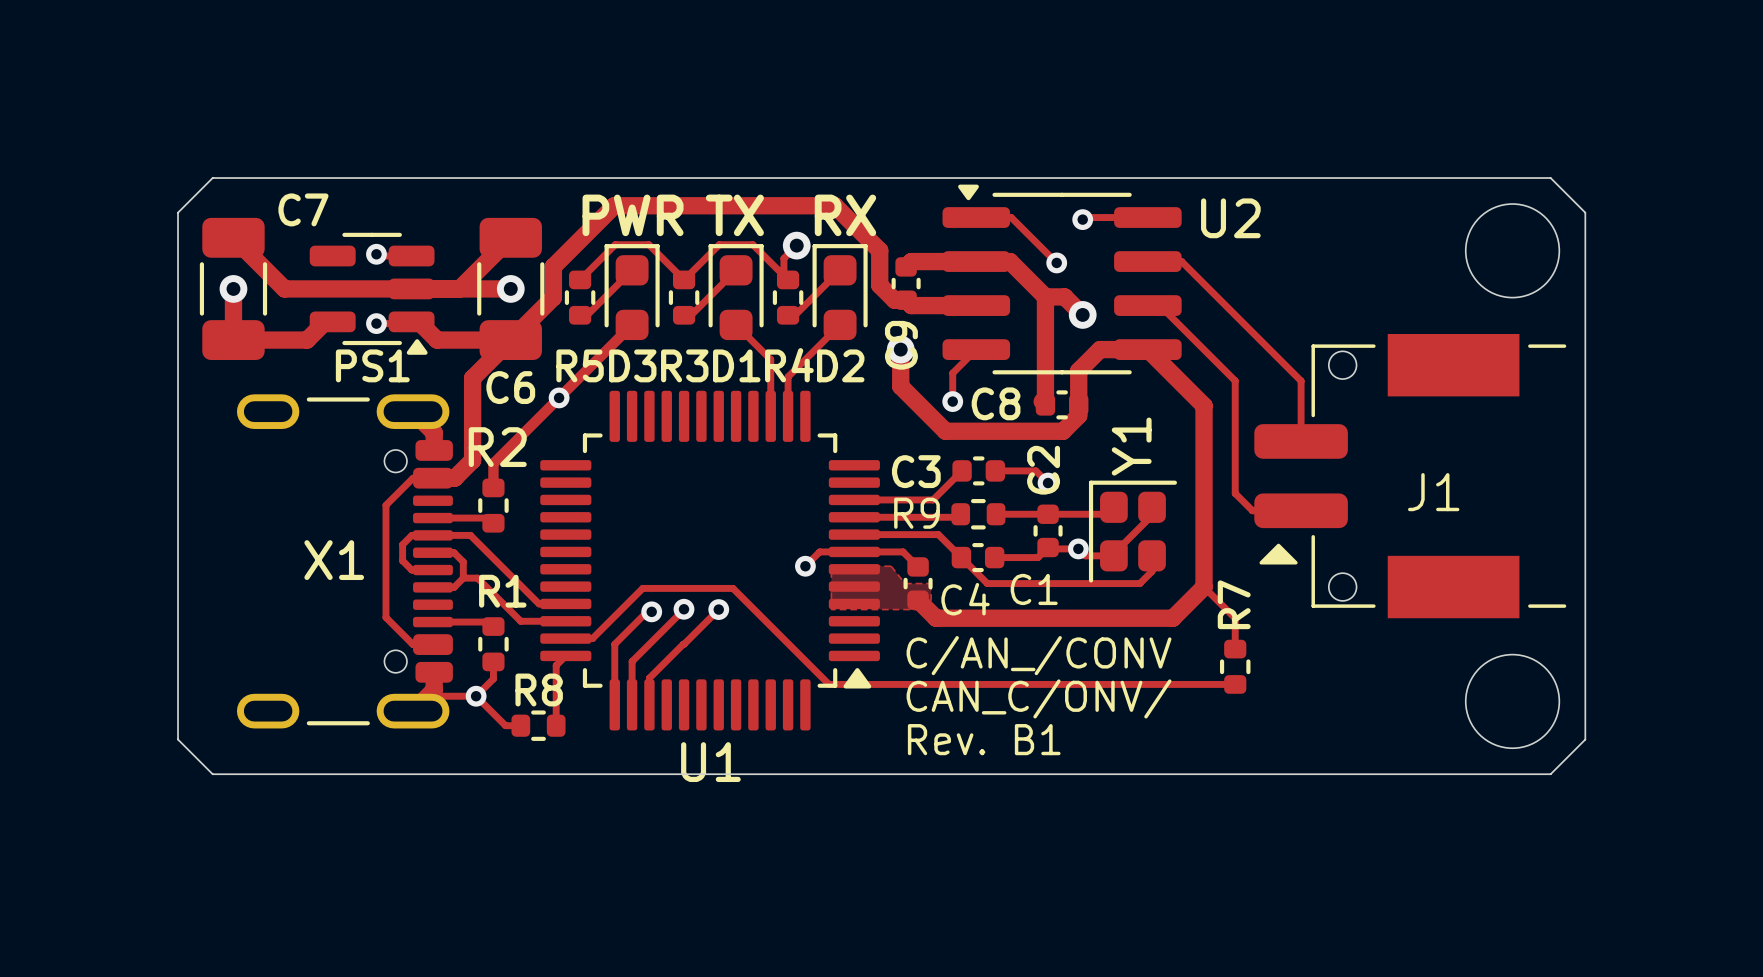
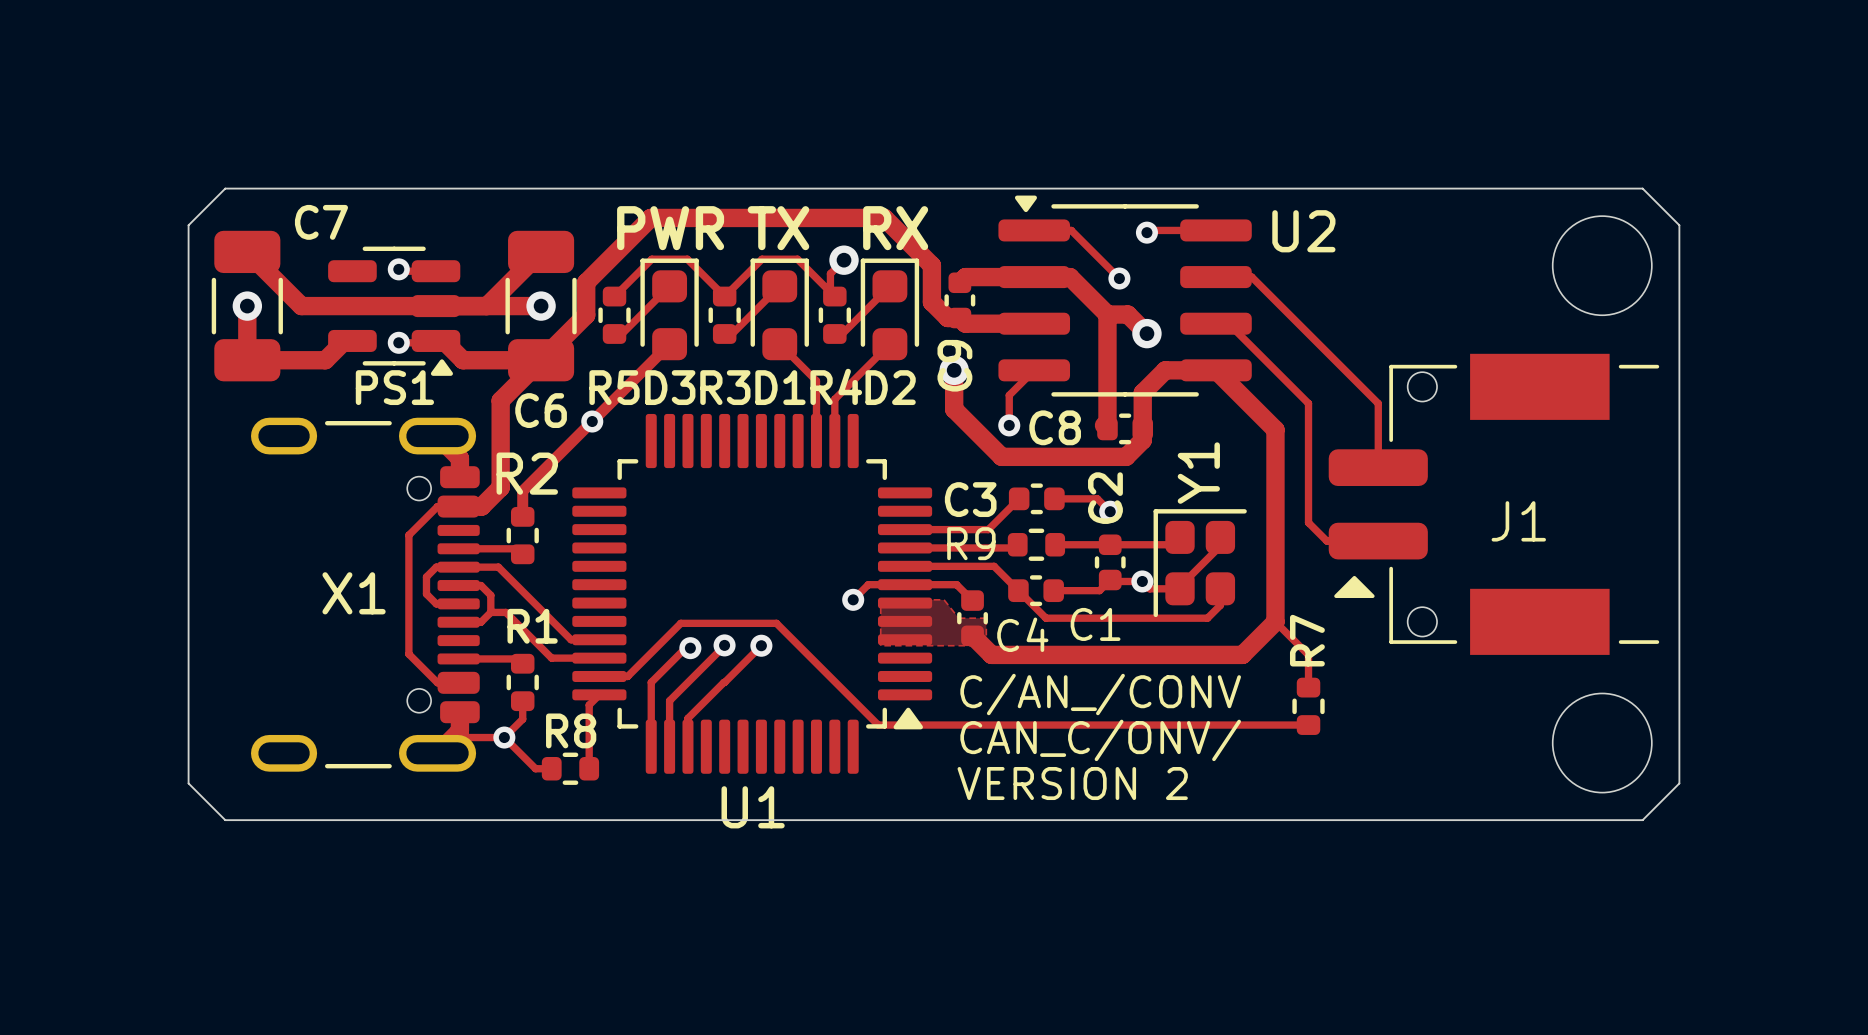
text: Rev. B1 (984, 739) -> VERSION 2 (1072, 783)

